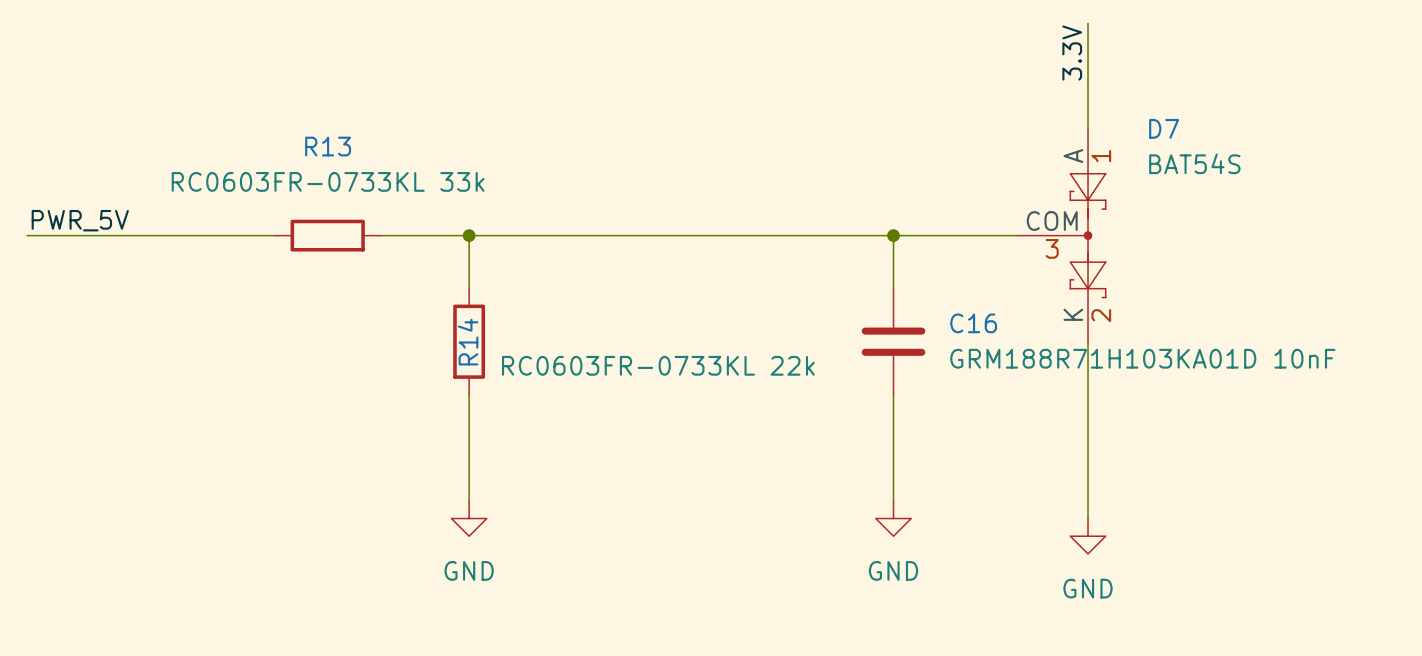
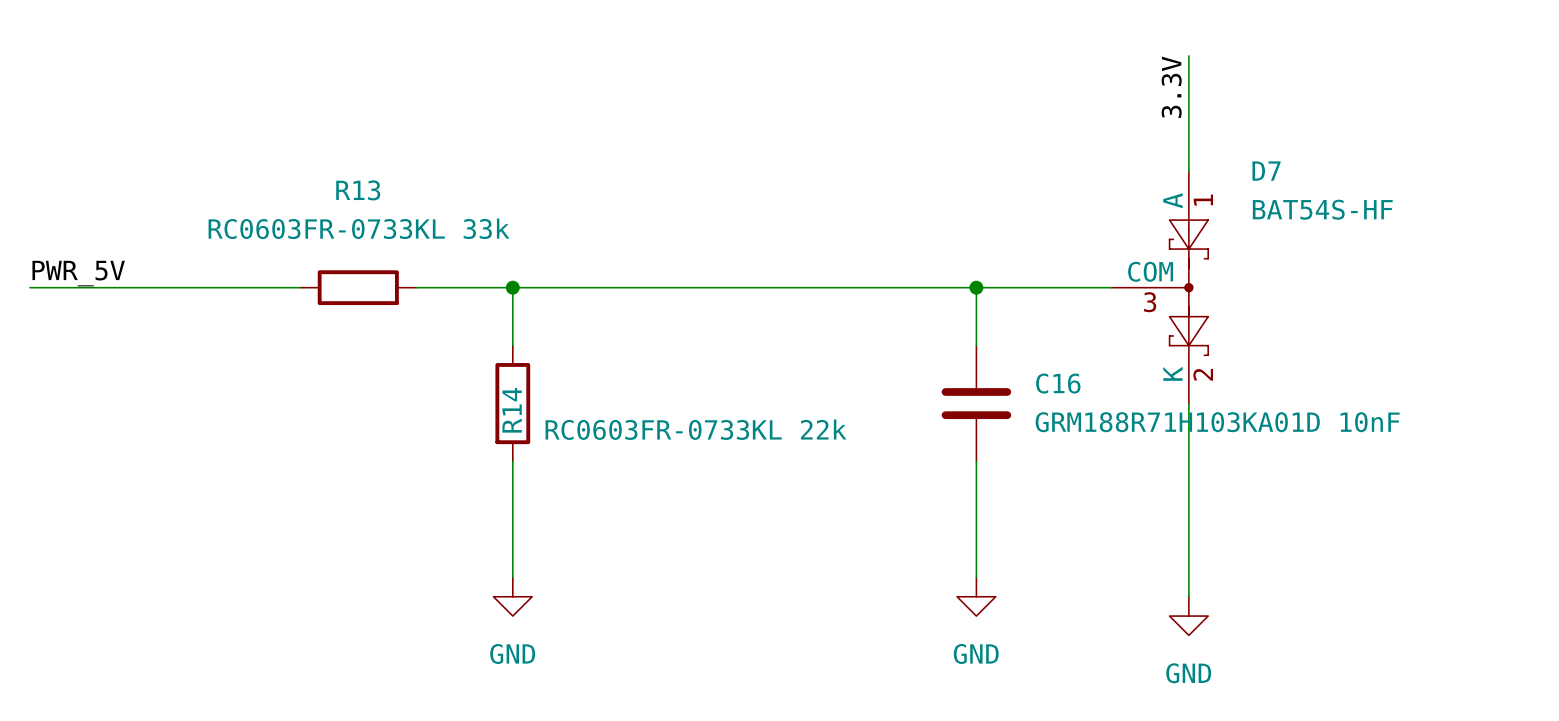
D7 value: BAT54S (1194, 163) -> BAT54S-HF (1322, 209)

